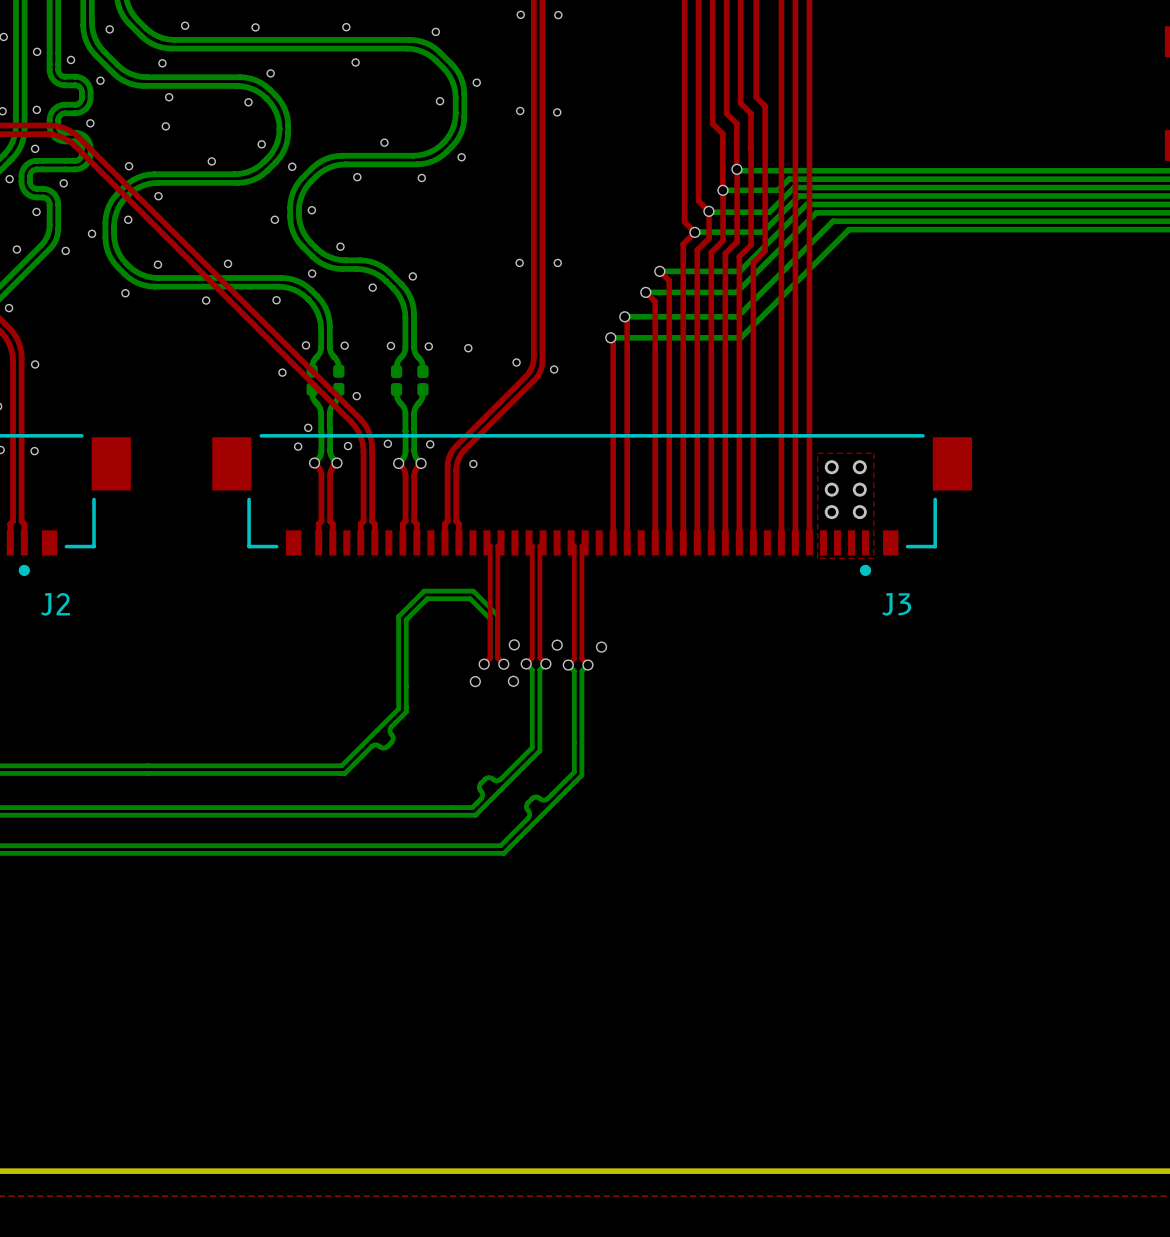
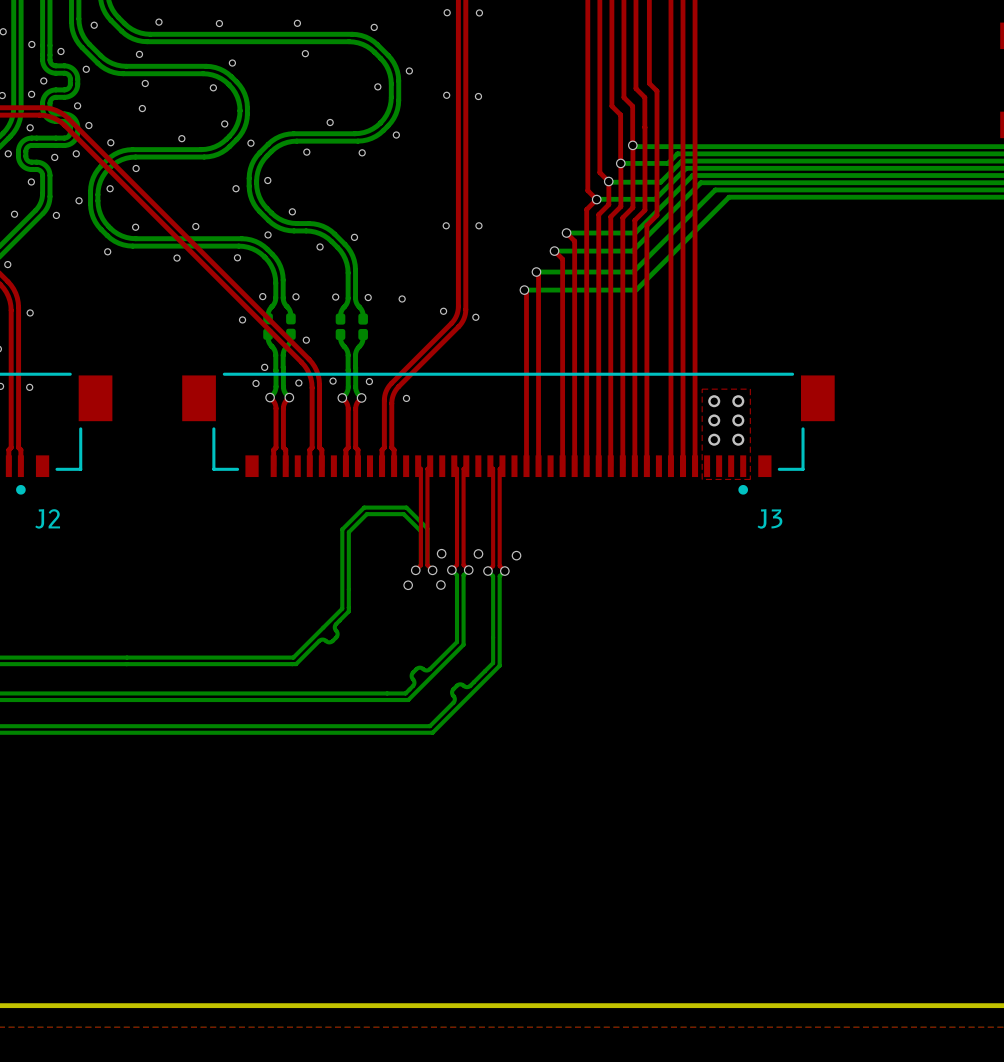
via: none -> (43, 80)
via: none -> (88, 125)
via: none -> (76, 153)

